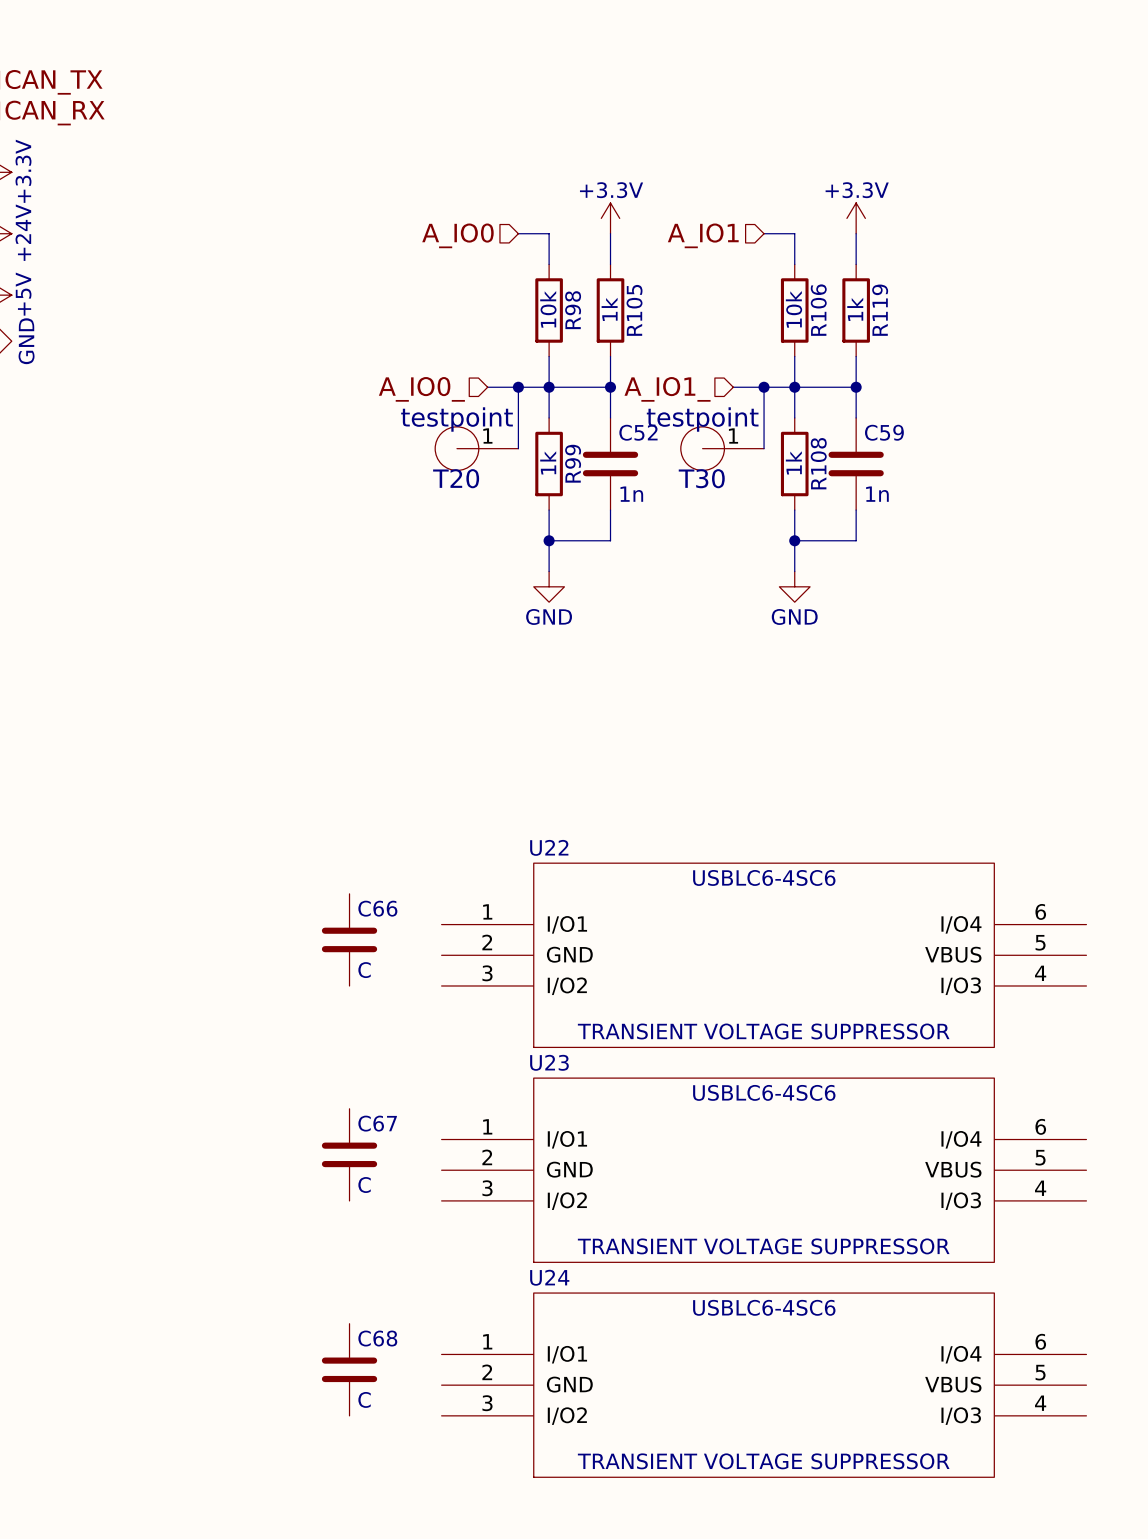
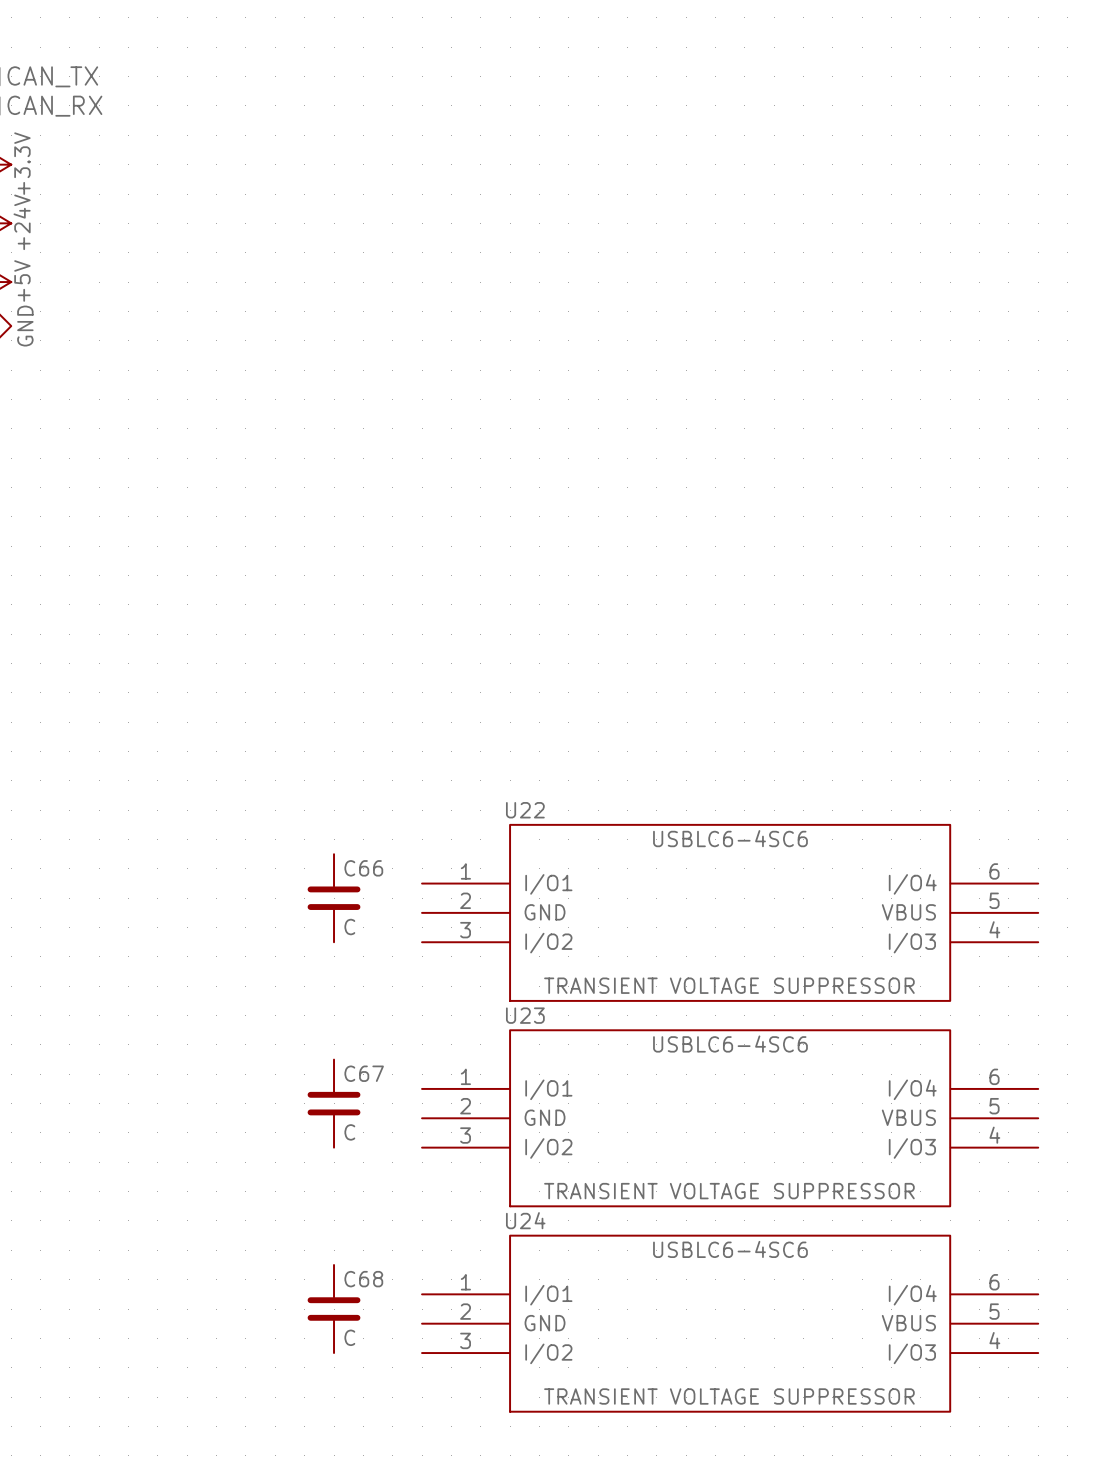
power symbol: +3.3V (610, 218) -> none
power symbol: +3.3V (856, 218) -> none
wire: (518, 233) (549, 233) (549, 264) -> none
wire: (610, 233) (610, 264) -> none
wire: (764, 233) (794, 233) (794, 264) -> none
wire: (856, 233) (856, 264) -> none
hierarchical label: A_IO0 (457, 235) -> none
hierarchical label: A_IO1 (703, 235) -> none
R98: 10k (549, 310) -> none
R105: 1k (610, 310) -> none
R106: 10k (794, 310) -> none
R119: 1k (856, 310) -> none
wire: (549, 356) (549, 417) -> none
wire: (610, 356) (610, 417) -> none
wire: (794, 356) (794, 417) -> none
wire: (856, 356) (856, 417) -> none
wire: (487, 387) (610, 387) -> none
wire: (518, 387) (518, 448) -> none
junction: (518, 387) -> none
junction: (549, 387) -> none
junction: (610, 387) -> none
wire: (733, 387) (856, 387) -> none
wire: (764, 387) (764, 448) -> none
junction: (764, 387) -> none
junction: (794, 387) -> none
junction: (856, 387) -> none
hierarchical label: A_IO0_ (421, 389) -> none
hierarchical label: A_IO1_ (667, 389) -> none
T20: testpoint (476, 448) -> none
T30: testpoint (722, 448) -> none
R99: 1k (549, 464) -> none
C52: 1n (610, 464) -> none
R108: 1k (794, 464) -> none
C59: 1n (856, 464) -> none
wire: (549, 510) (549, 571) -> none
wire: (610, 510) (610, 540) (549, 540) -> none
wire: (794, 510) (794, 571) -> none
wire: (856, 510) (856, 540) (794, 540) -> none
junction: (549, 540) -> none
junction: (794, 540) -> none
power symbol: GND (549, 586) -> none
power symbol: GND (794, 586) -> none

